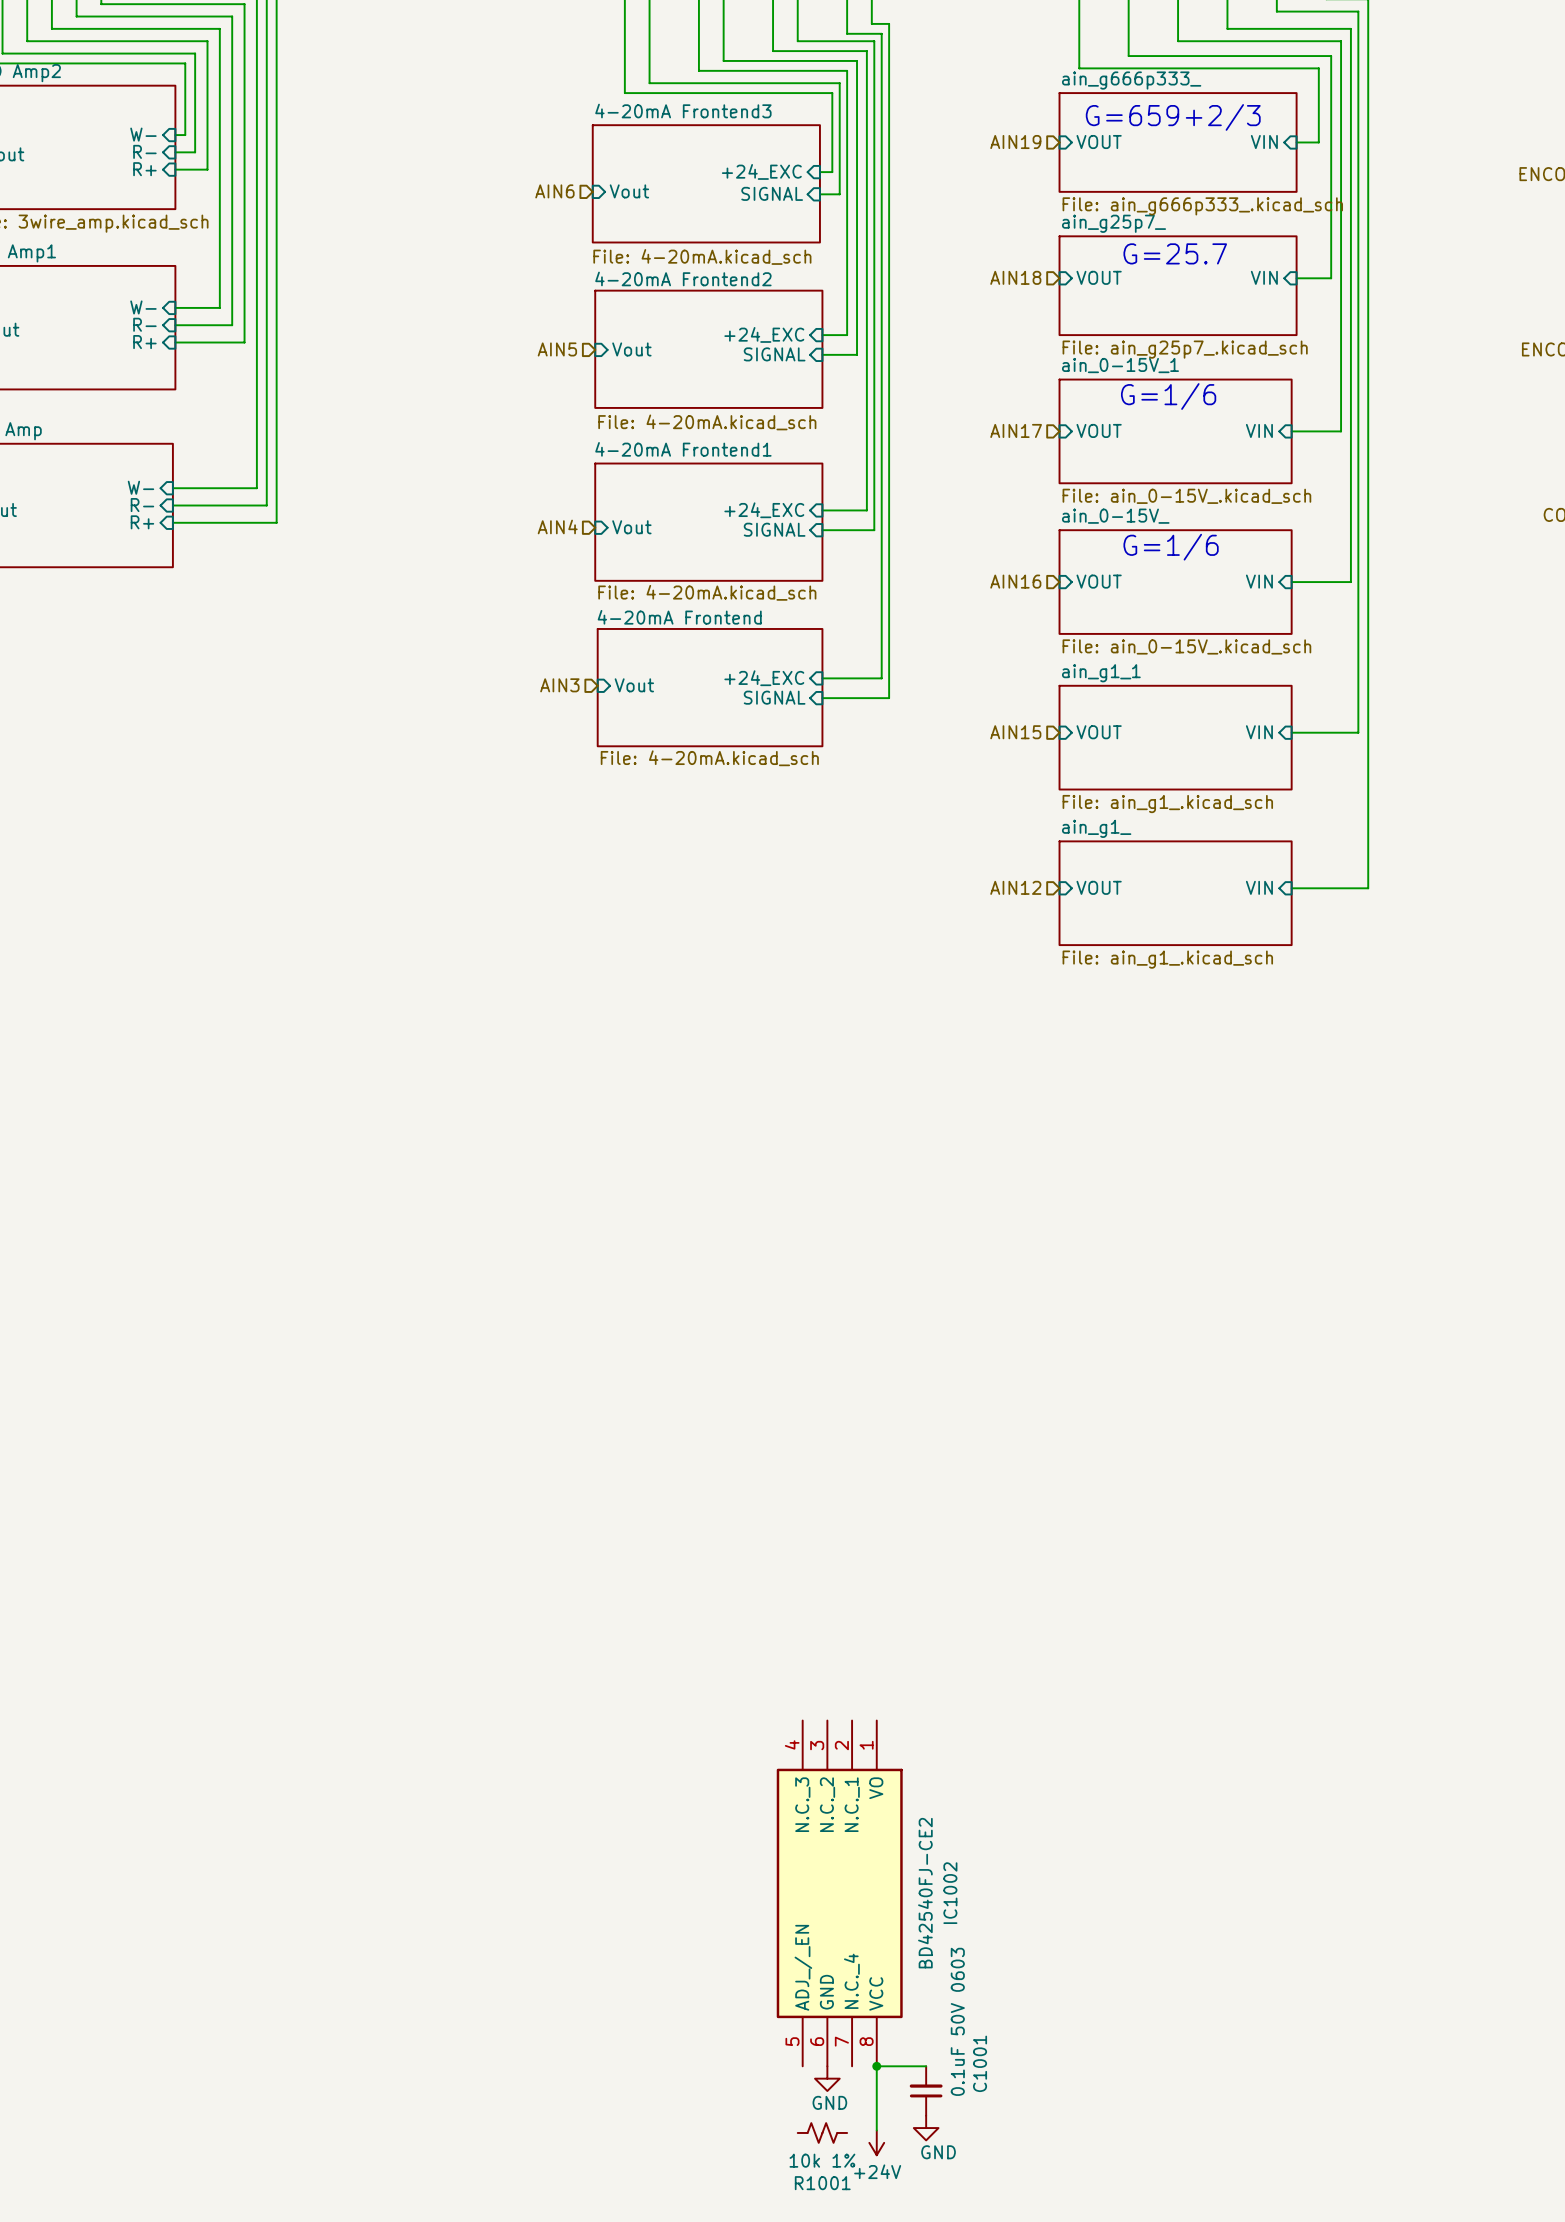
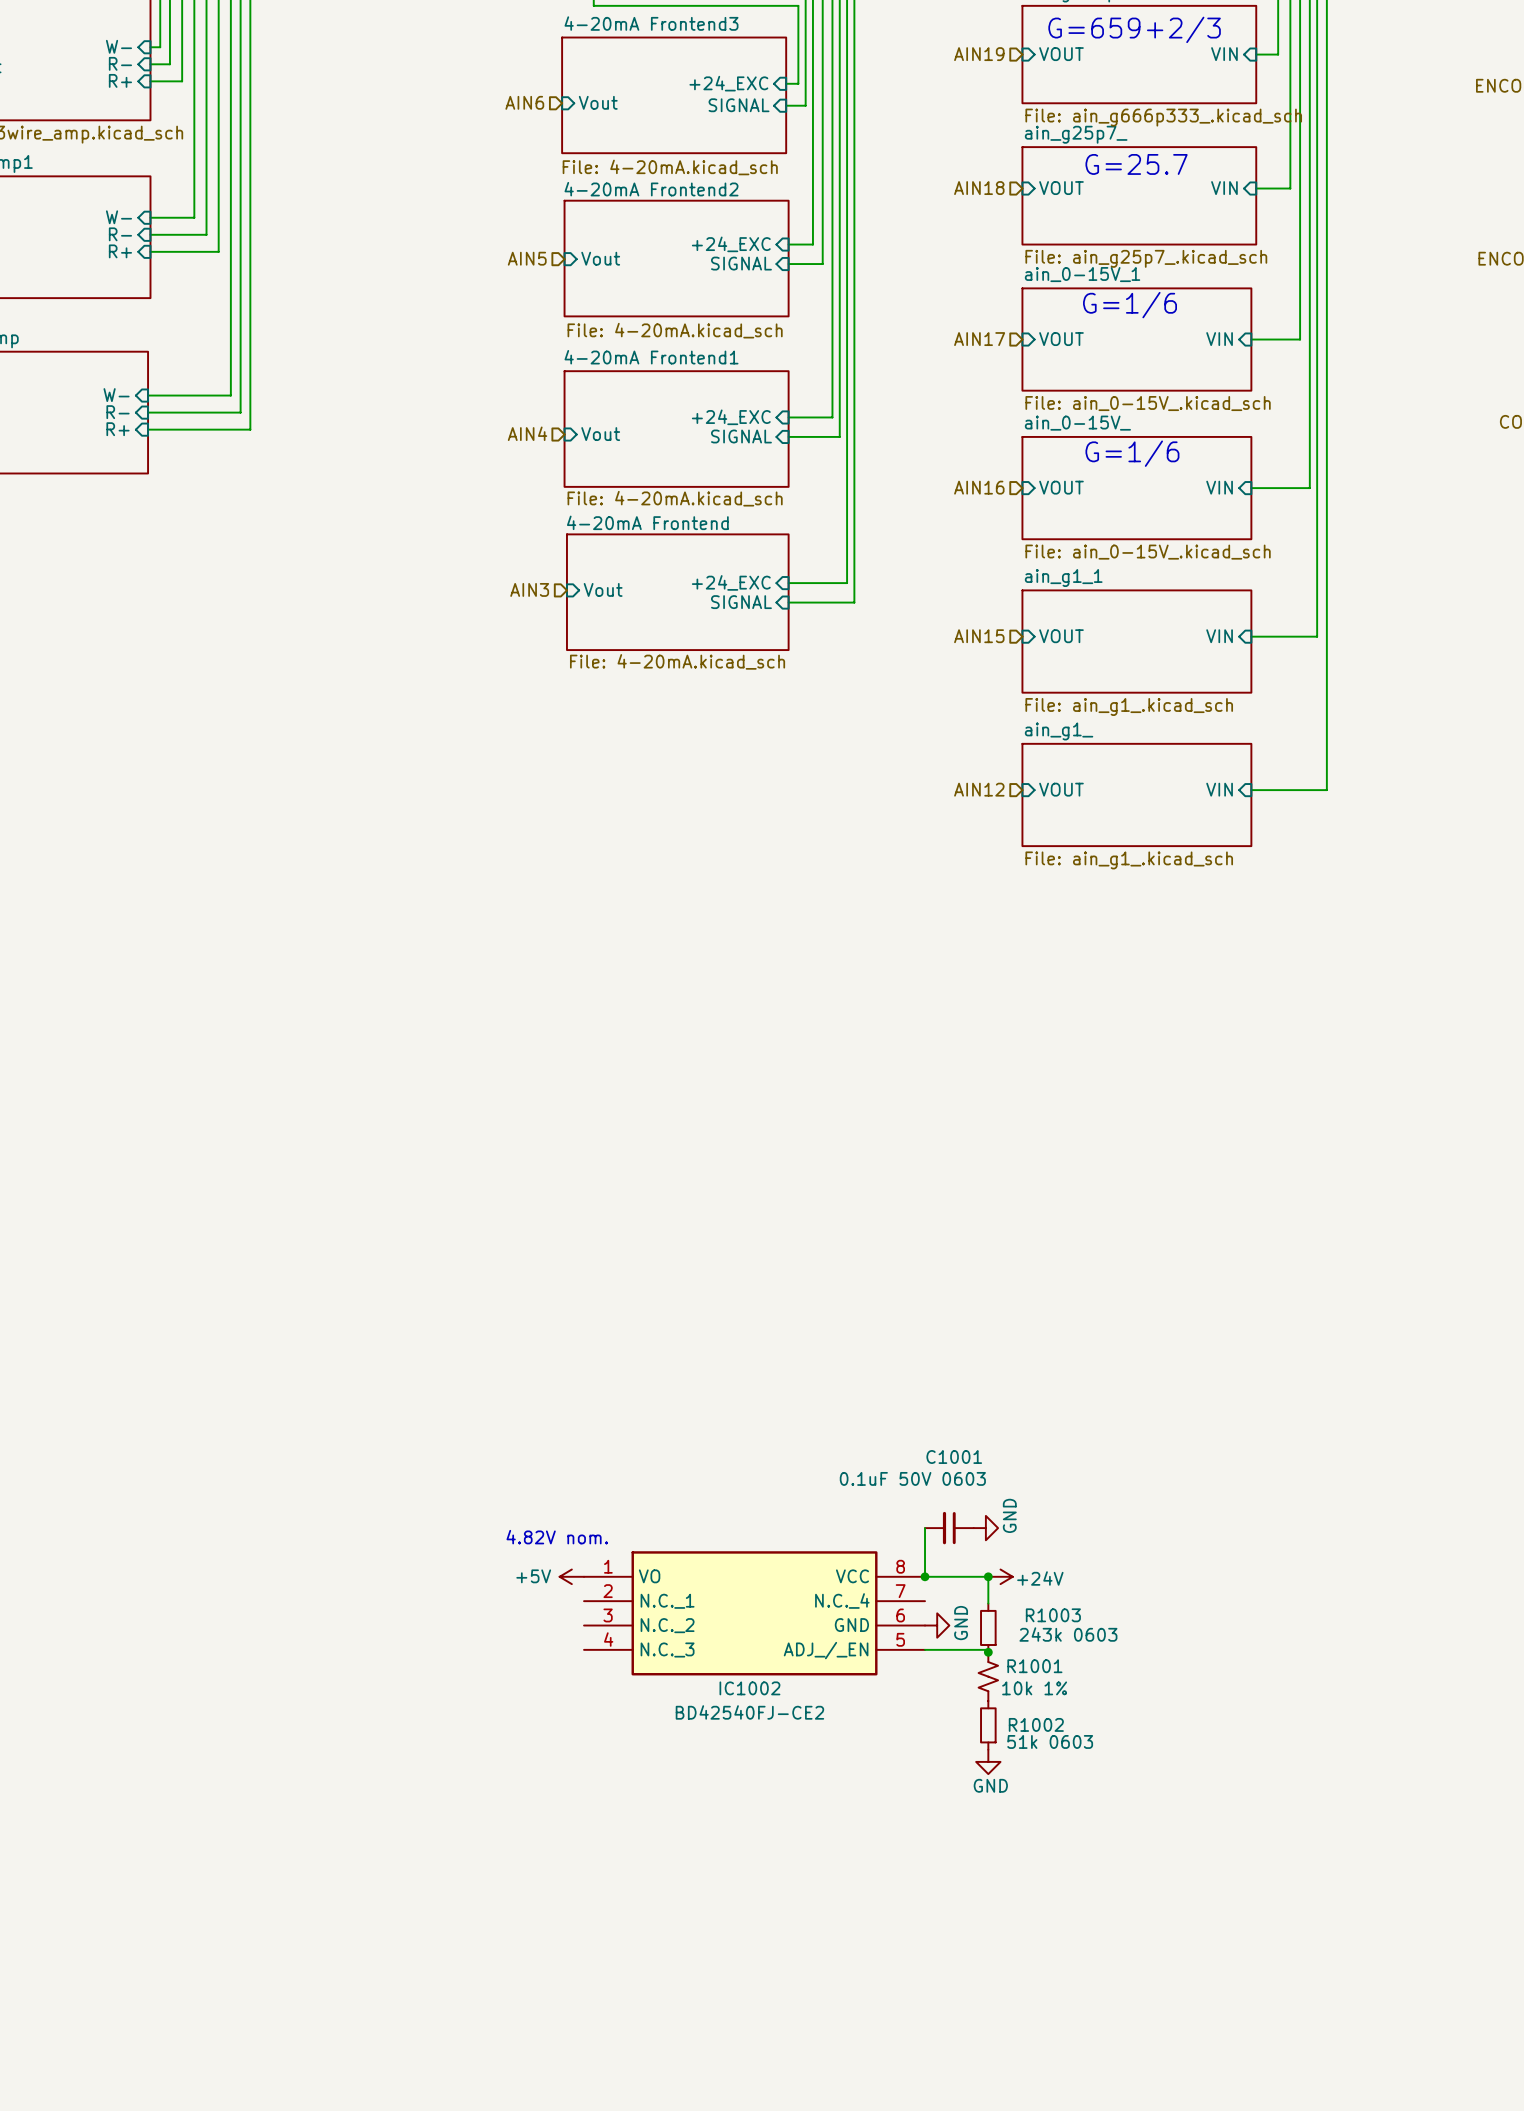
wire: none -> (925, 1528) (925, 1576) (988, 1576) (988, 1603)
power symbol: none -> GND (985, 1528)
text: none -> 4.82V nom. (557, 1537)
power symbol: none -> +5V (571, 1576)
junction: none -> (925, 1576)
junction: none -> (988, 1576)
power symbol: none -> +24V (1000, 1576)
power symbol: none -> GND (937, 1625)
R1003: none -> 243k 0603 (988, 1627)
wire: none -> (925, 1649) (988, 1649) (988, 1652)
junction: none -> (988, 1652)
R1002: none -> 51k 0603 (988, 1725)
power symbol: none -> GND (988, 1761)
IC1002 rotation: 0° (839, 1893) -> 90° counterclockwise (754, 1613)
IC1002 value position: BD42540FJ-CE2 (925, 1893) -> BD42540FJ-CE2 (749, 1712)
IC1002 name position: IC1002 (950, 1893) -> IC1002 (749, 1688)
C1001 value position: 0.1uF 50V 0603 (957, 2021) -> 0.1uF 50V 0603 (912, 1478)
C1001 name position: C1001 (980, 2063) -> C1001 (954, 1457)
junction: (876, 2066) -> none
wire: (926, 2066) (876, 2066) (876, 2130) -> none
power symbol: GND (827, 2078) -> none
C1001 rotation: 0° (926, 2090) -> 90° counterclockwise (949, 1528)
C1001 position: (926, 2091) -> (949, 1528)
power symbol: GND (926, 2128) -> none
R1001 rotation: 0° (822, 2132) -> 90° clockwise (988, 1676)
R1001 position: (822, 2132) -> (988, 1676)
power symbol: +24V (876, 2142) -> none
R1001 value position: 10k 1% (822, 2160) -> 10k 1% (1034, 1688)
R1001 name position: R1001 (822, 2183) -> R1001 (1034, 1666)

